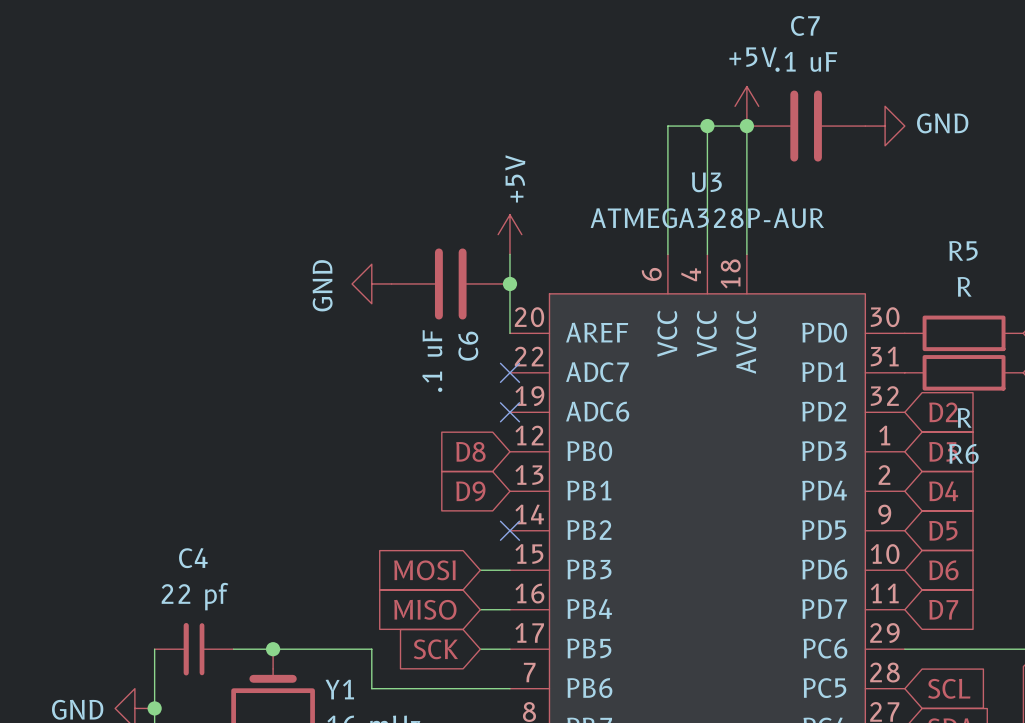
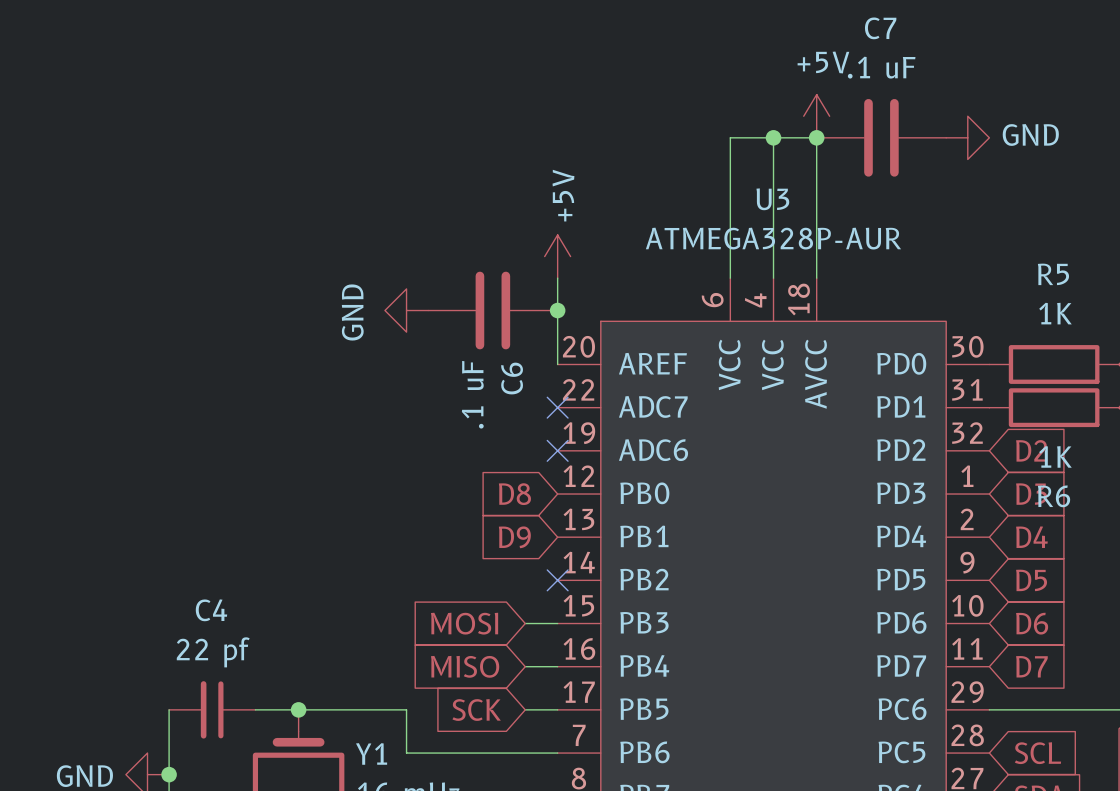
R5 value: R (964, 286) -> 1K (1055, 313)
R6 value: R (964, 417) -> 1K (1055, 456)

